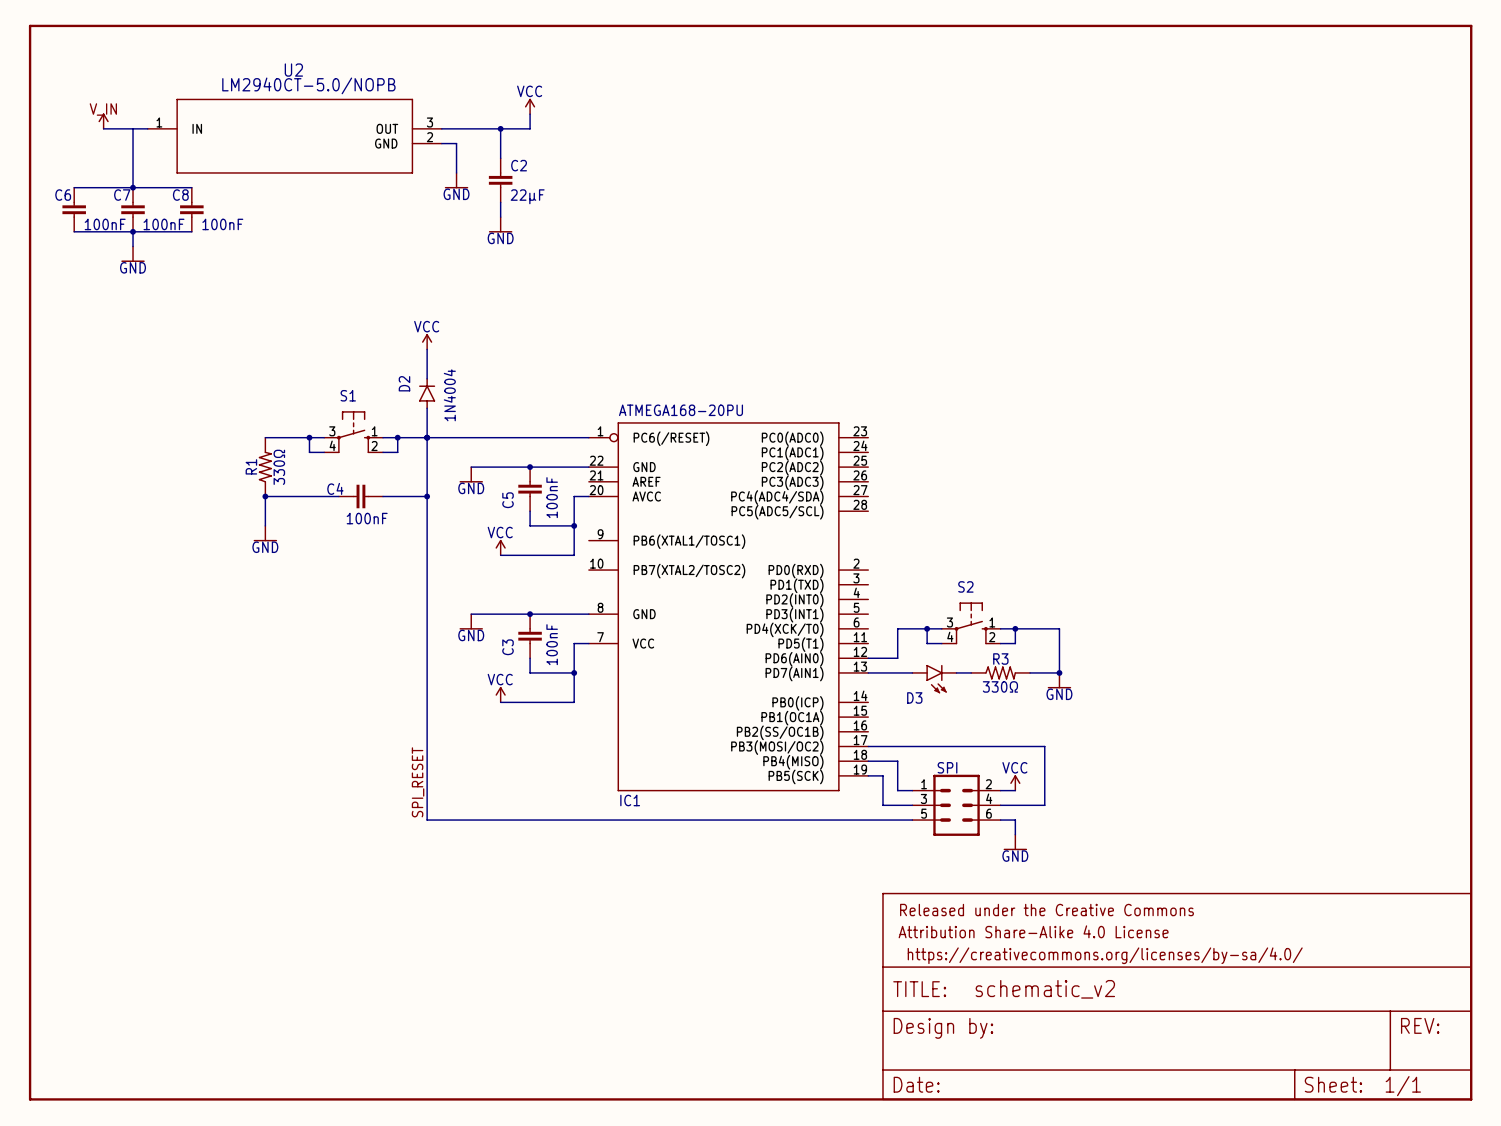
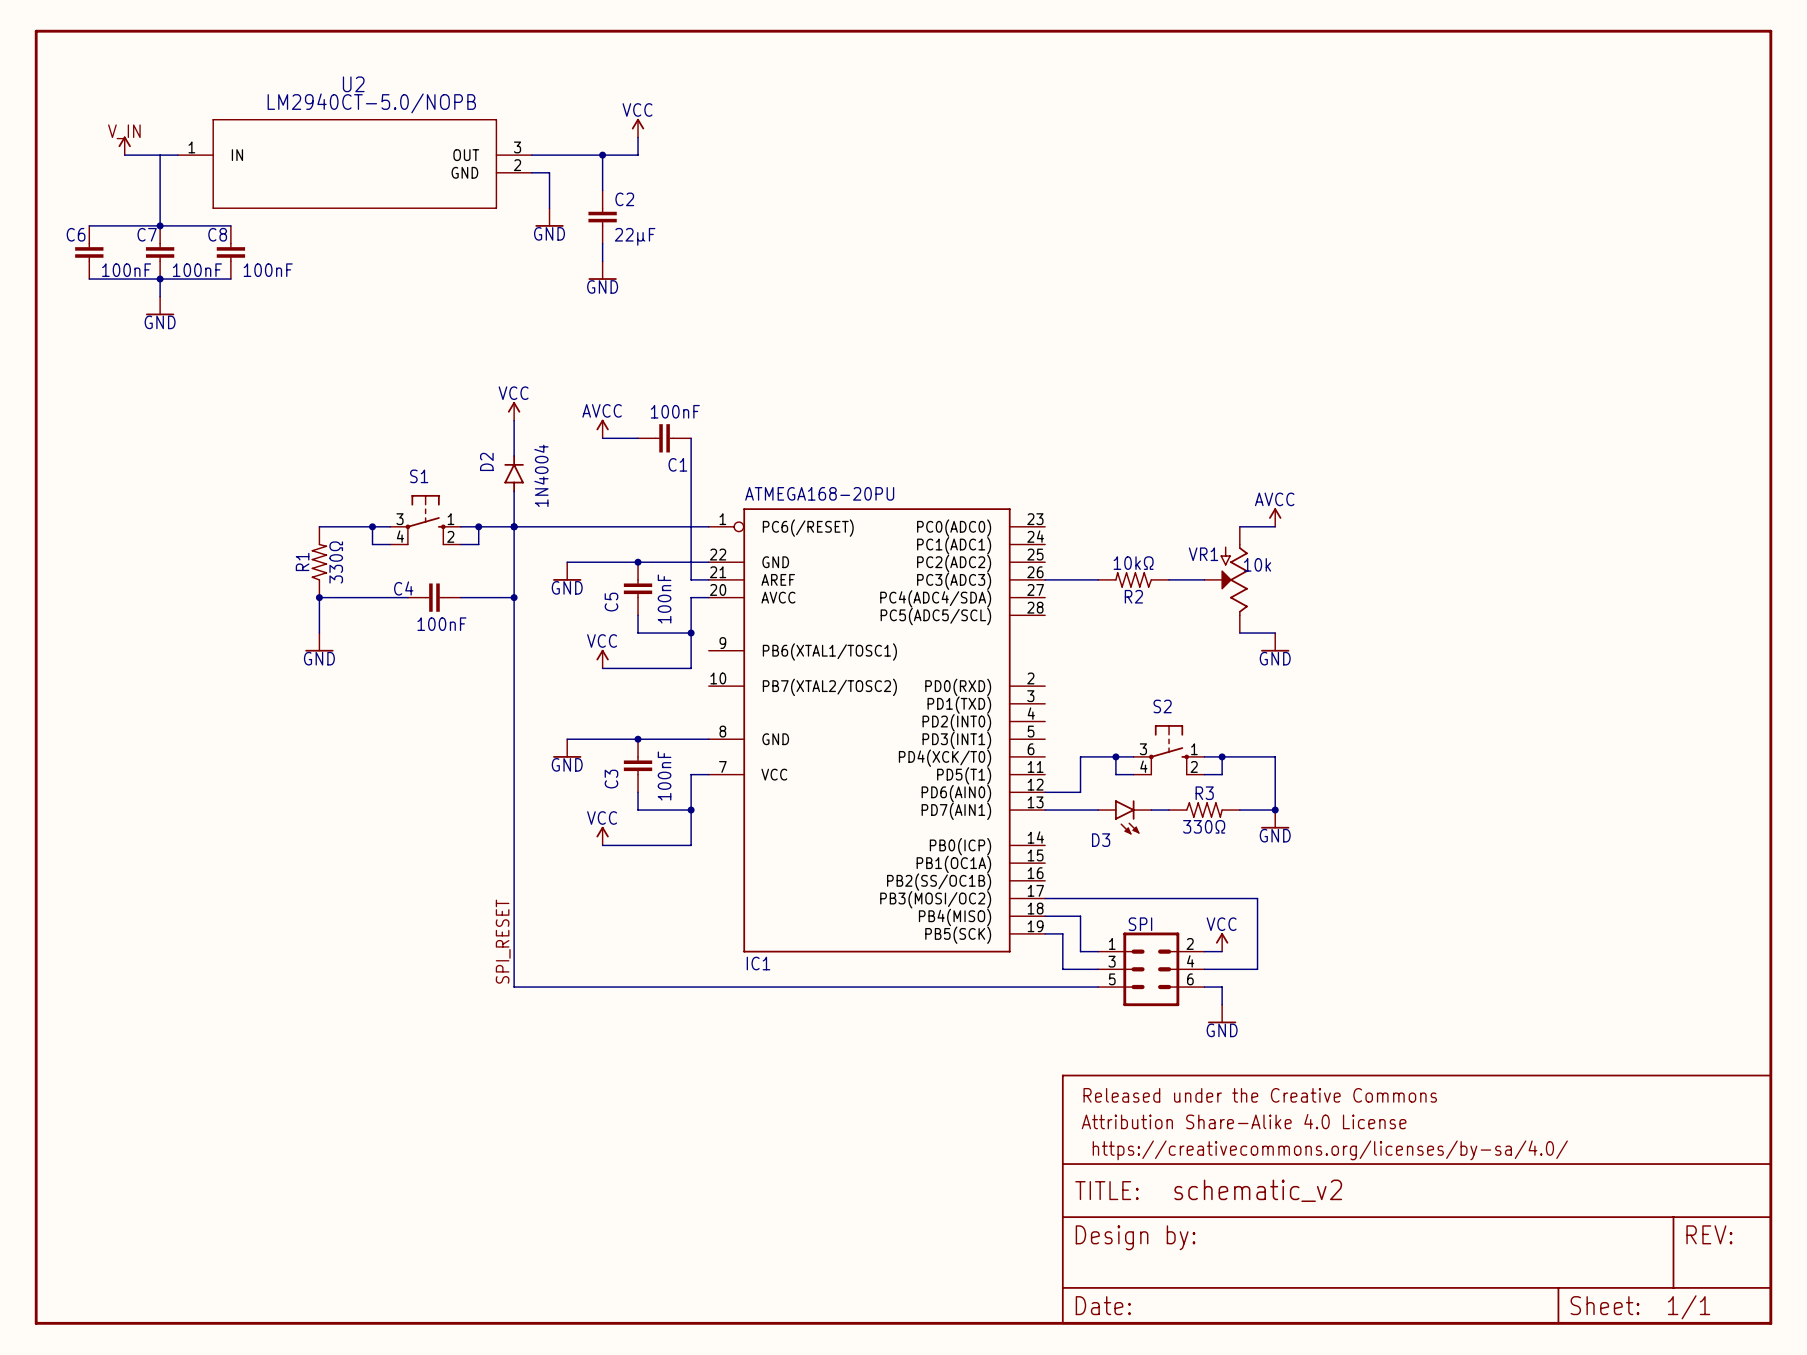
power symbol: none -> AVCC (602, 429)
wire: none -> (602, 438) (638, 438)
C1: none -> 100nF (664, 438)
wire: none -> (691, 438) (691, 579) (708, 579)
power symbol: none -> AVCC (1275, 517)
wire: none -> (1239, 526) (1275, 526)
wire: none -> (1045, 579) (1098, 579)
R2: none -> 10kΩ (1133, 579)
wire: none -> (1169, 579) (1204, 579)
VR1: none -> 10k (1226, 579)
wire: none -> (1239, 633) (1275, 633)
power symbol: none -> GND (1275, 642)

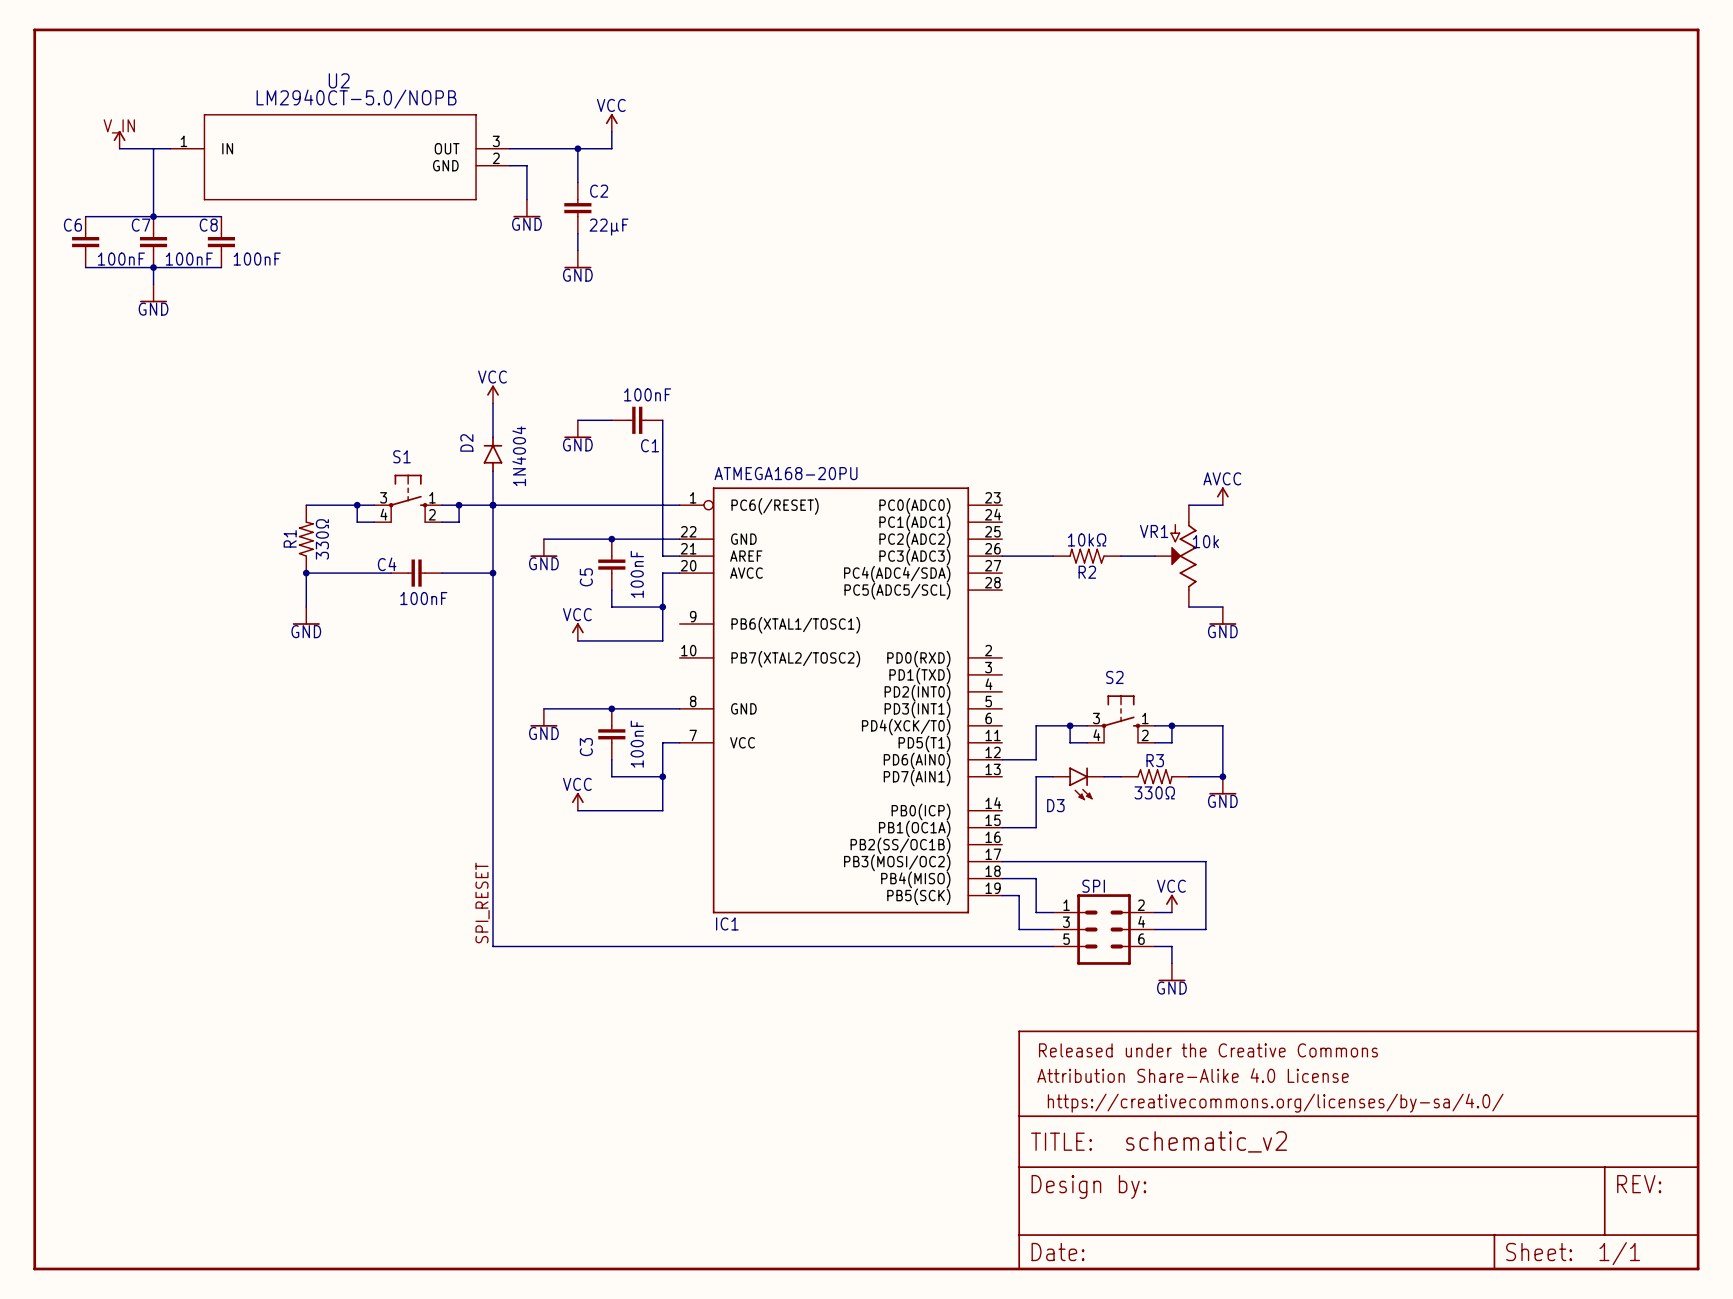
power symbol: AVCC (602, 429) -> none
power symbol: none -> GND (577, 429)
wire: (1045, 810) (1080, 810) -> (1002, 827) (1036, 827) (1036, 776)

